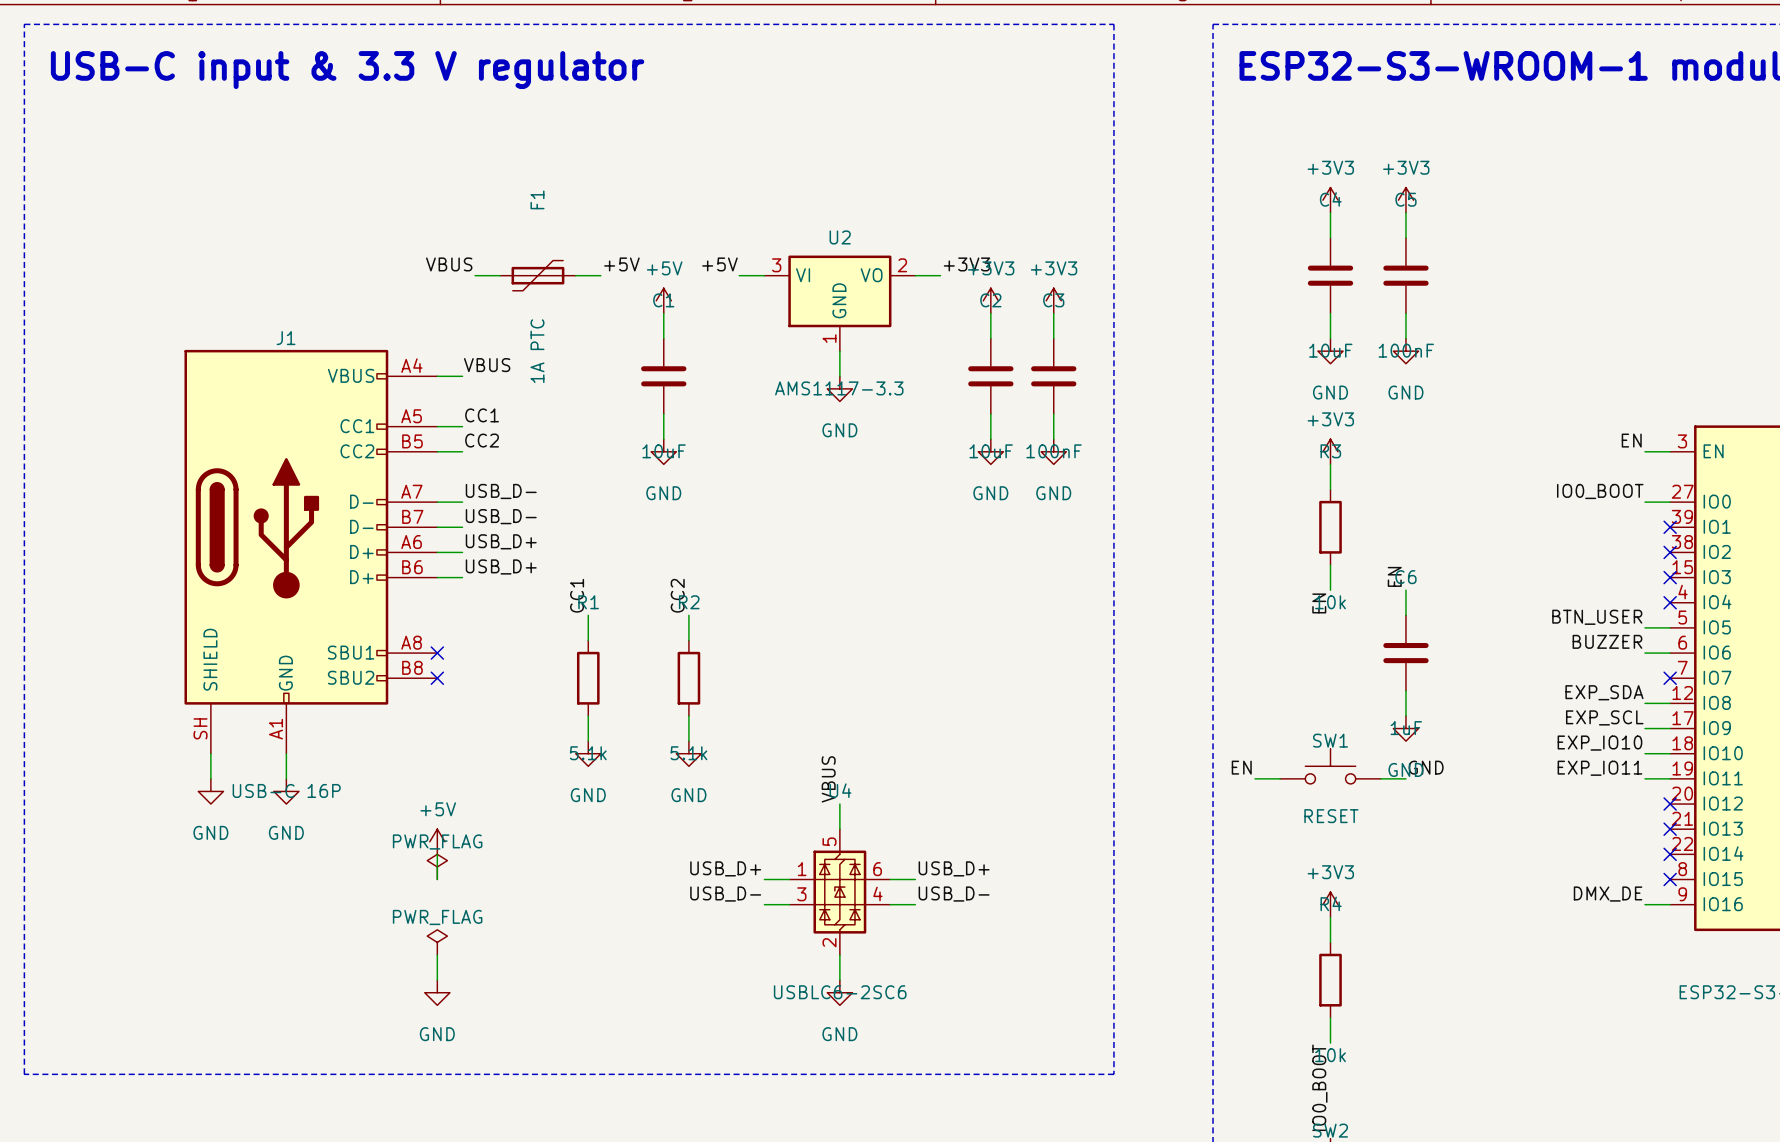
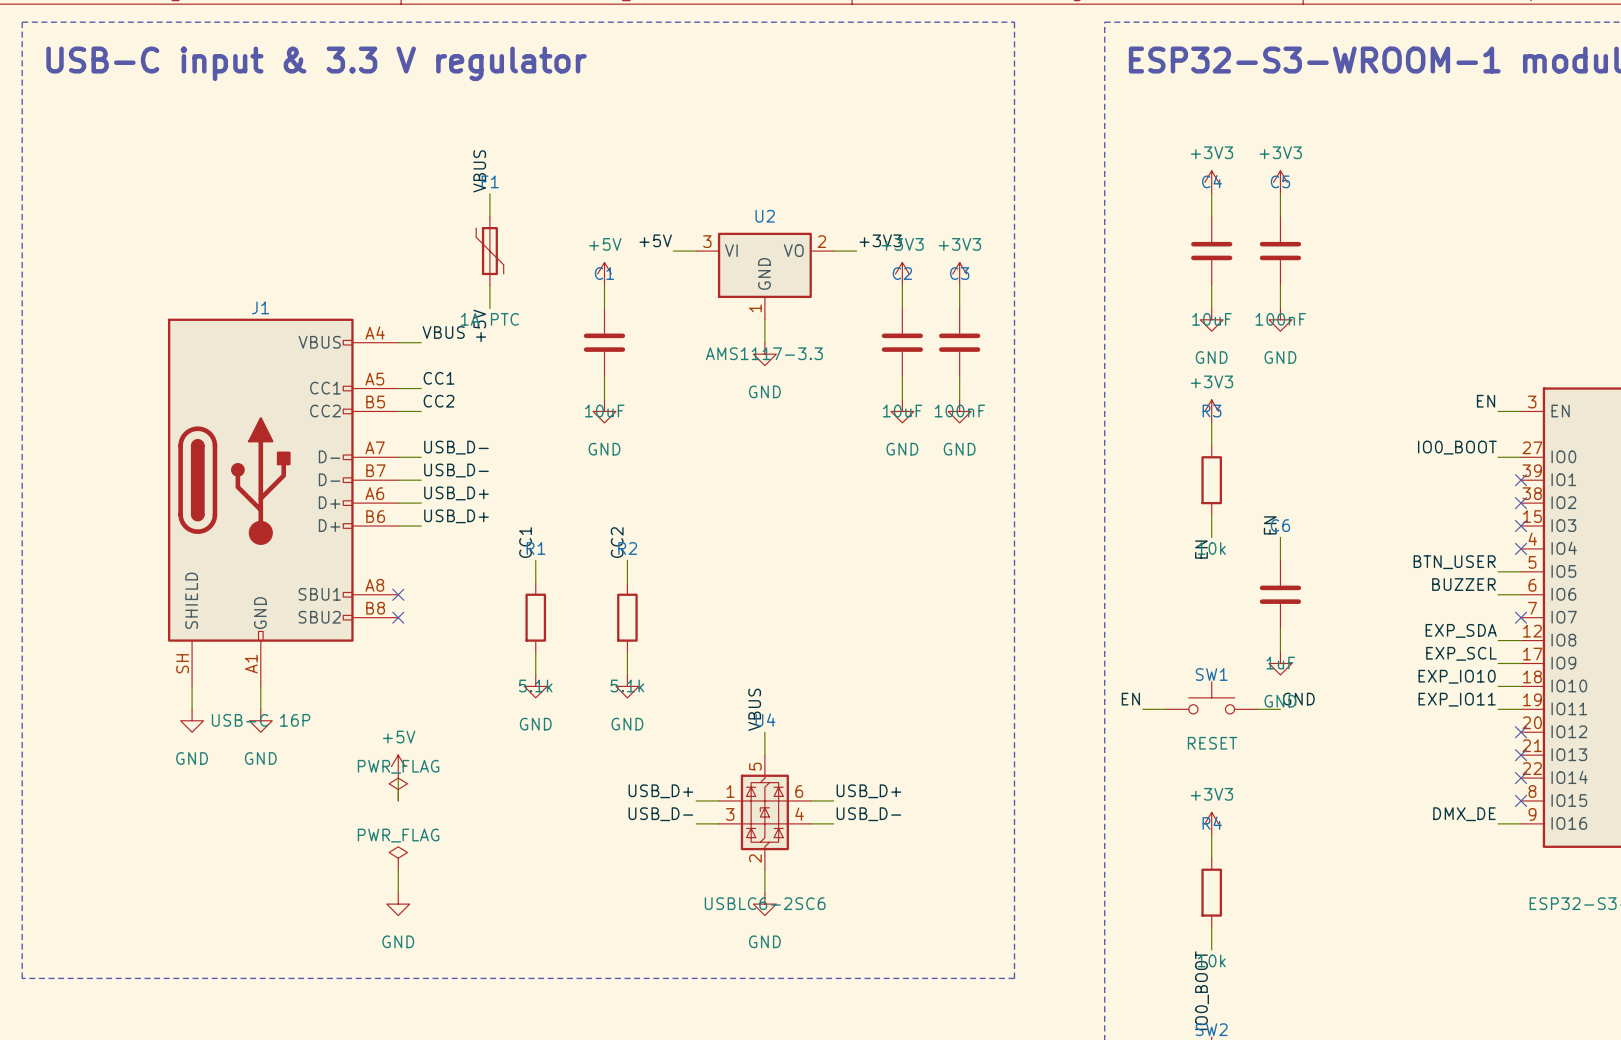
wire: none -> (489, 193) (489, 216)
label rotation: 0° (449, 264) -> 90° counterclockwise (479, 171)
label position: VBUS (449, 264) -> VBUS (479, 171)
label rotation: 0° (621, 264) -> 90° counterclockwise (479, 325)
label position: +5V (621, 264) -> +5V (479, 325)
wire: (475, 275) (500, 275) -> none
F1 rotation: 0° (537, 275) -> 90° clockwise (489, 251)
wire: (575, 275) (600, 275) -> none
wire: none -> (489, 285) (489, 308)

